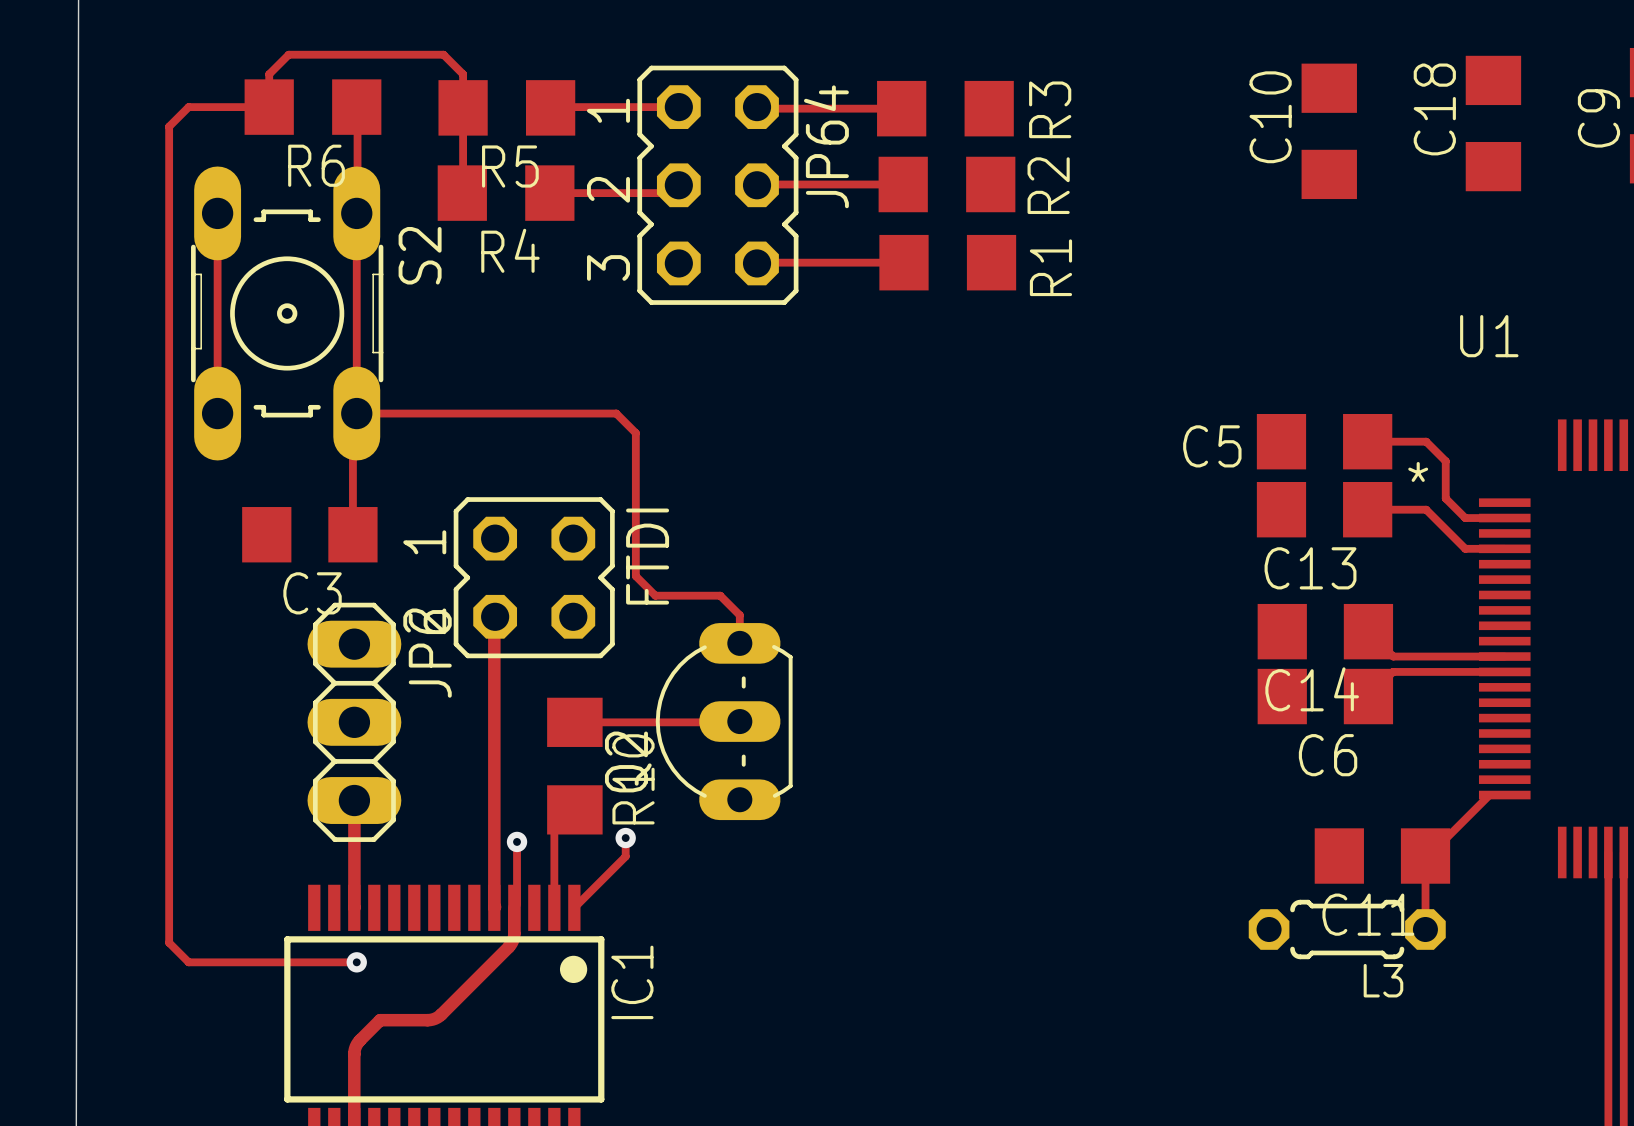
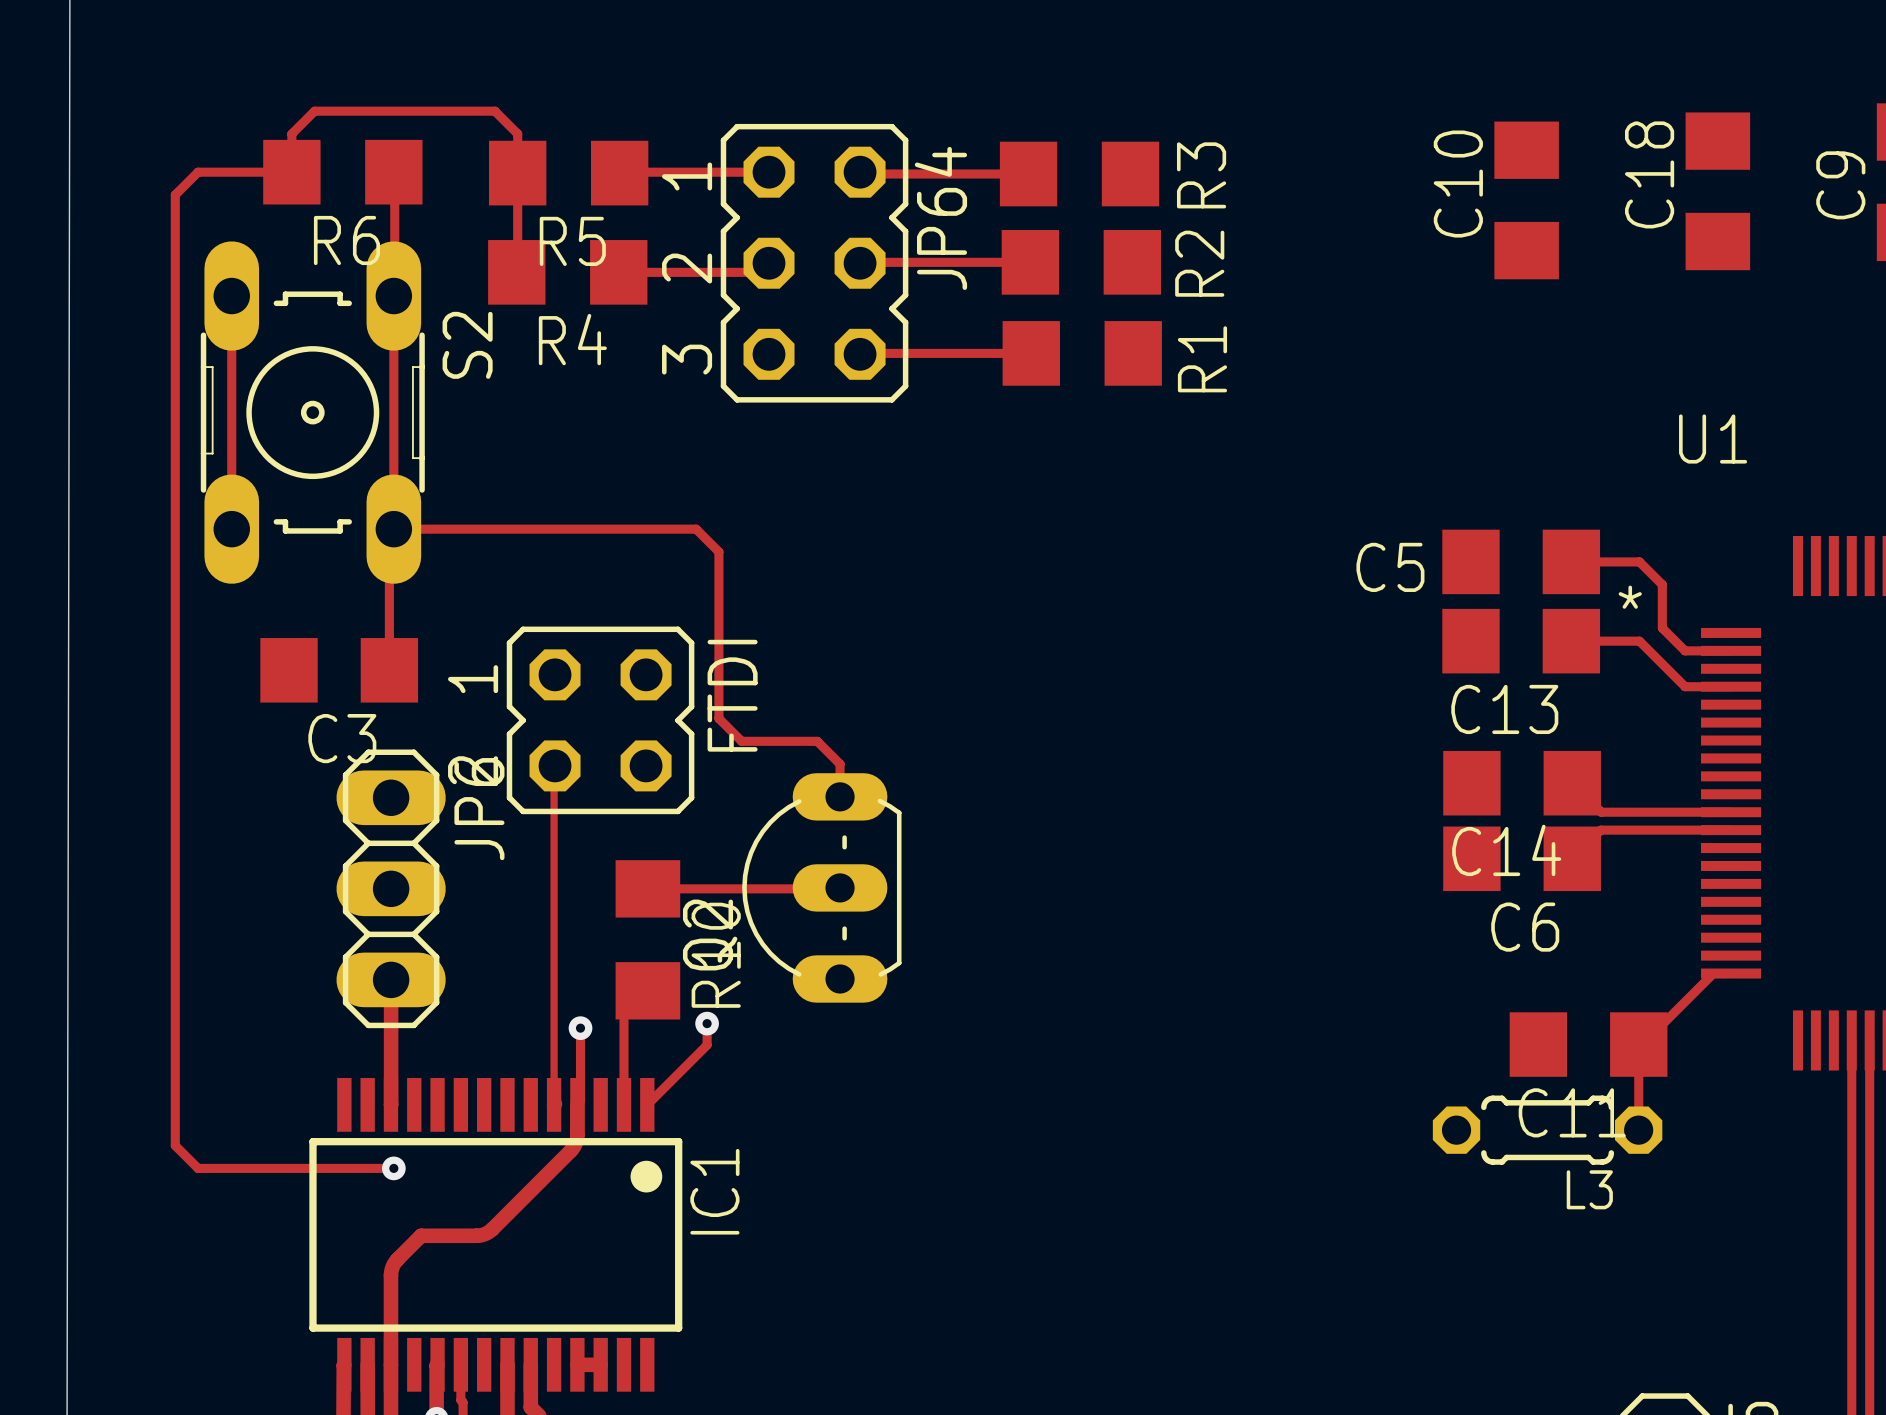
track width: thick (494, 617) (494, 907) -> thin (554, 766) (554, 1104)

